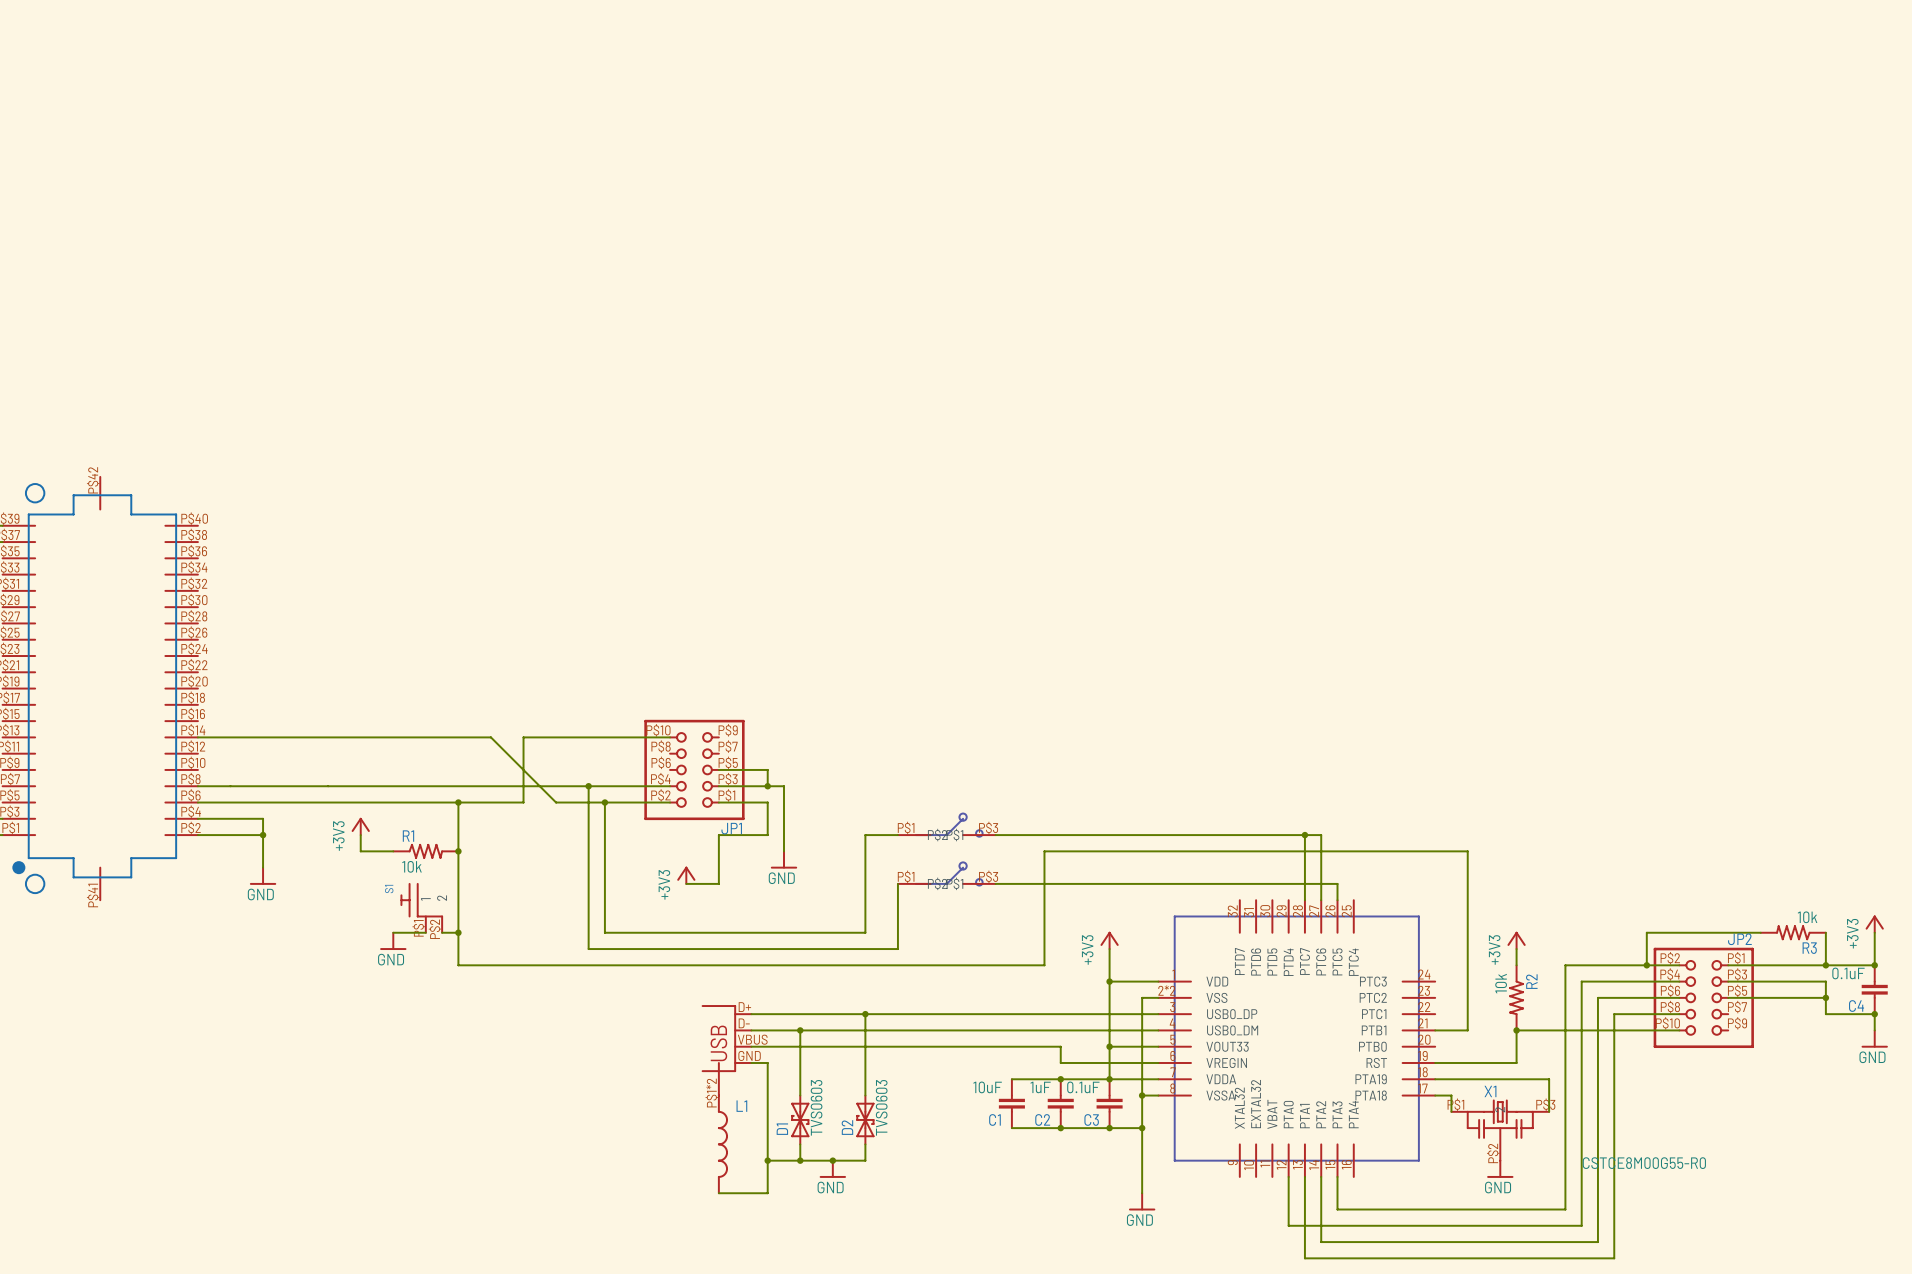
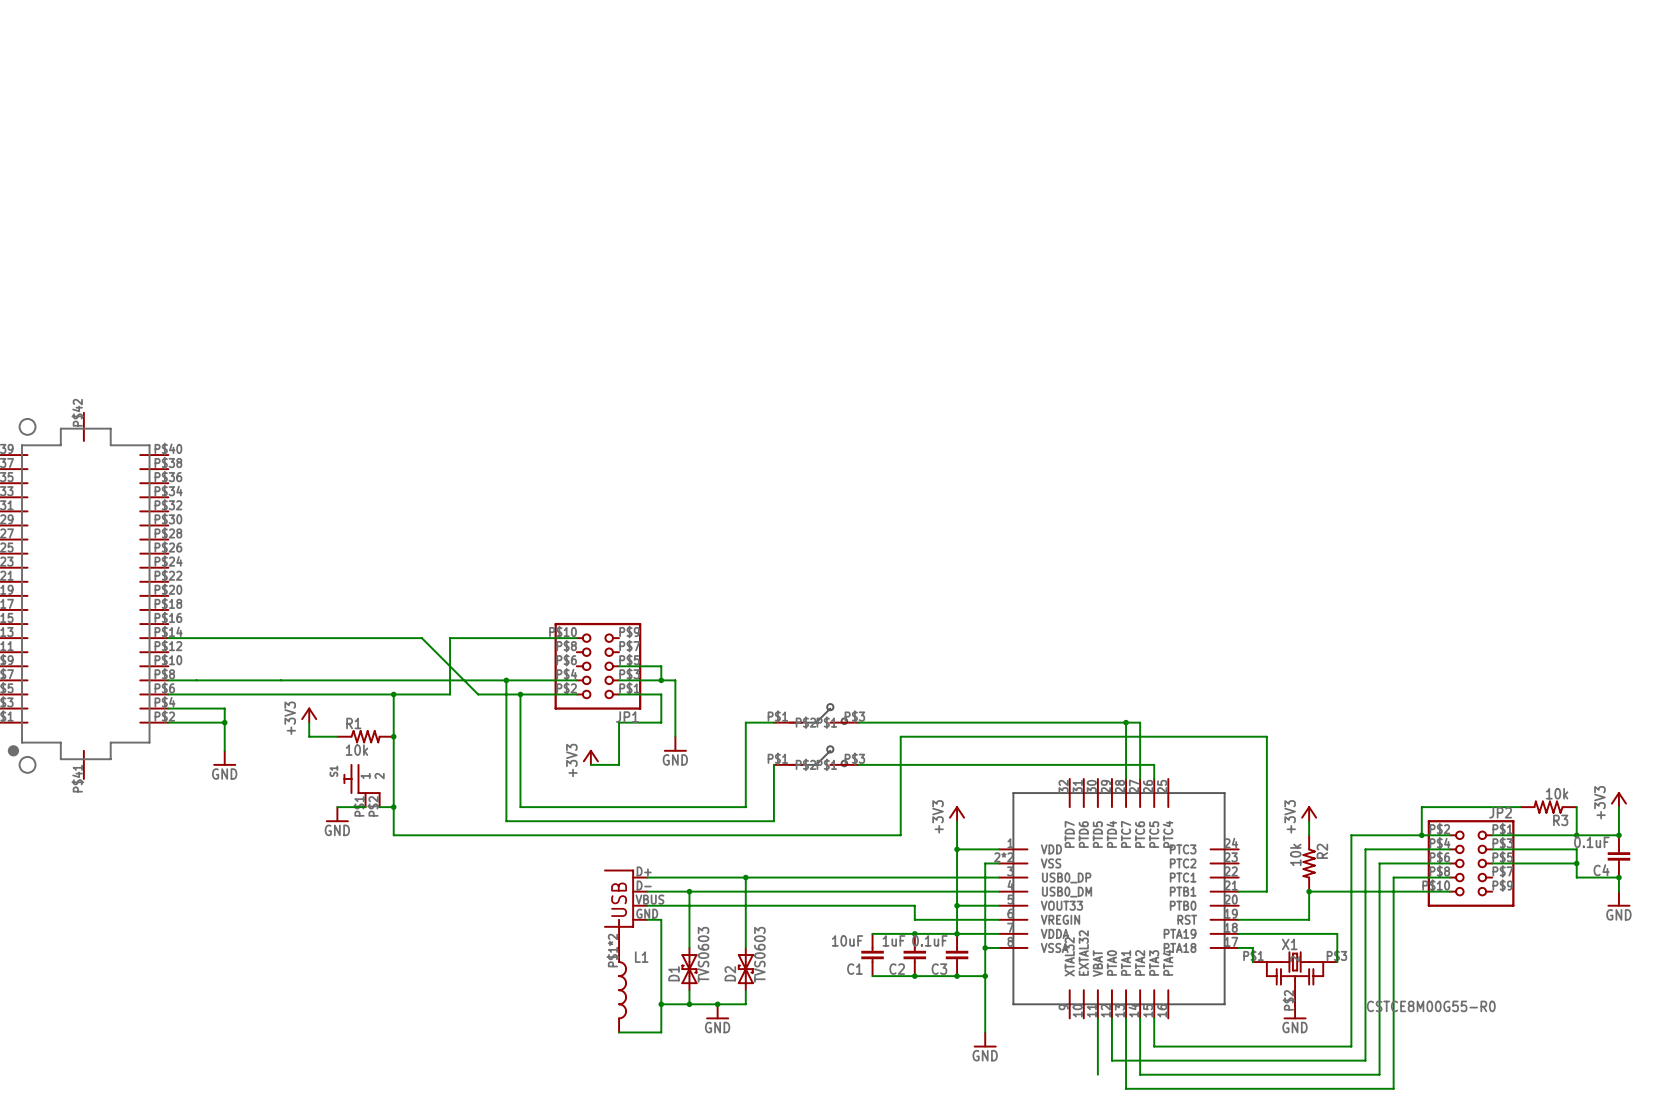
wire: none -> (1097, 1018) (1097, 1074)

